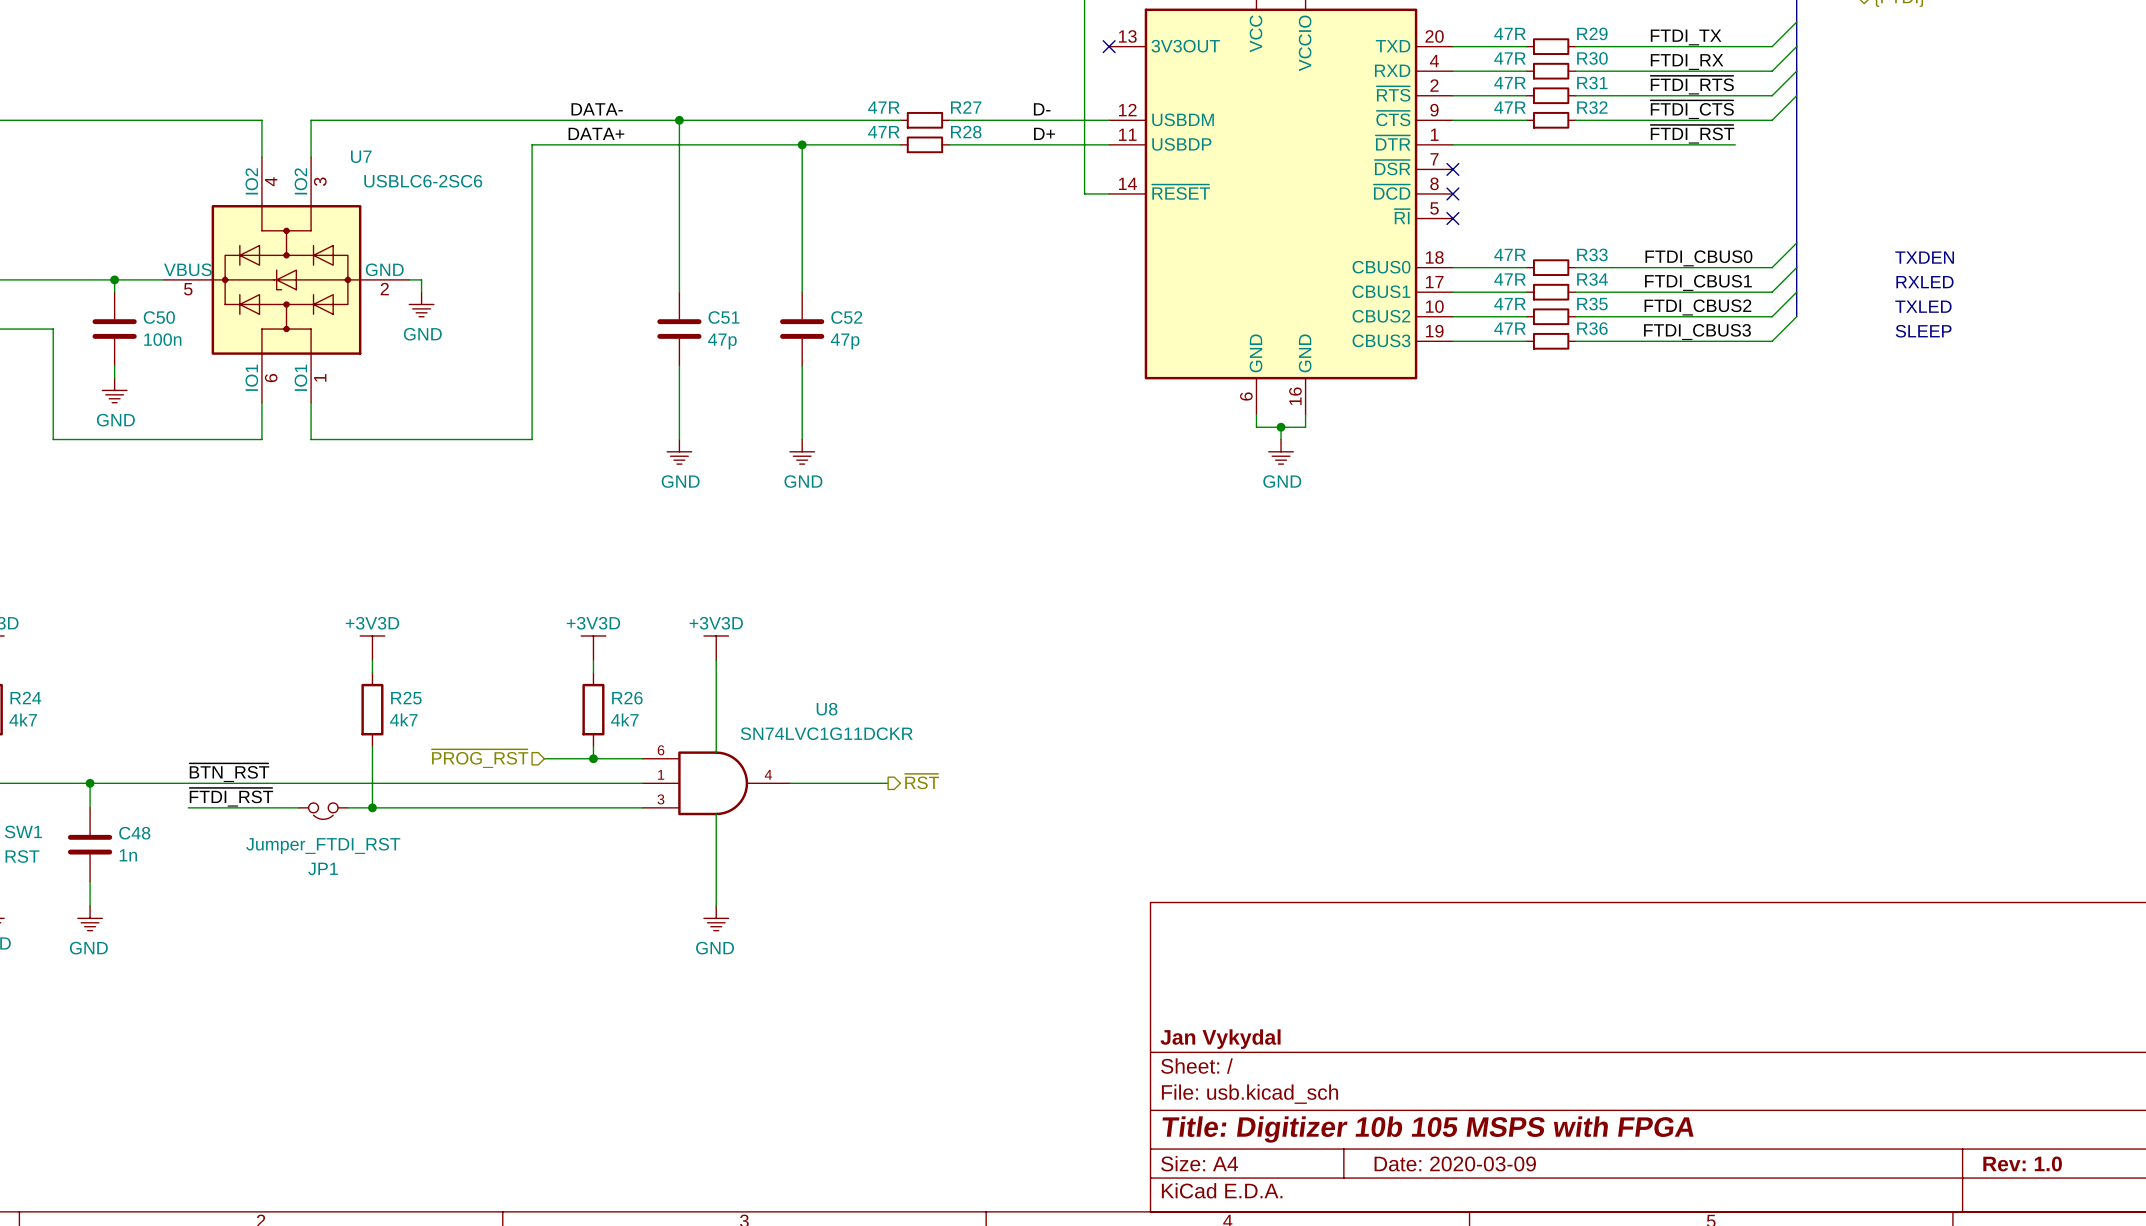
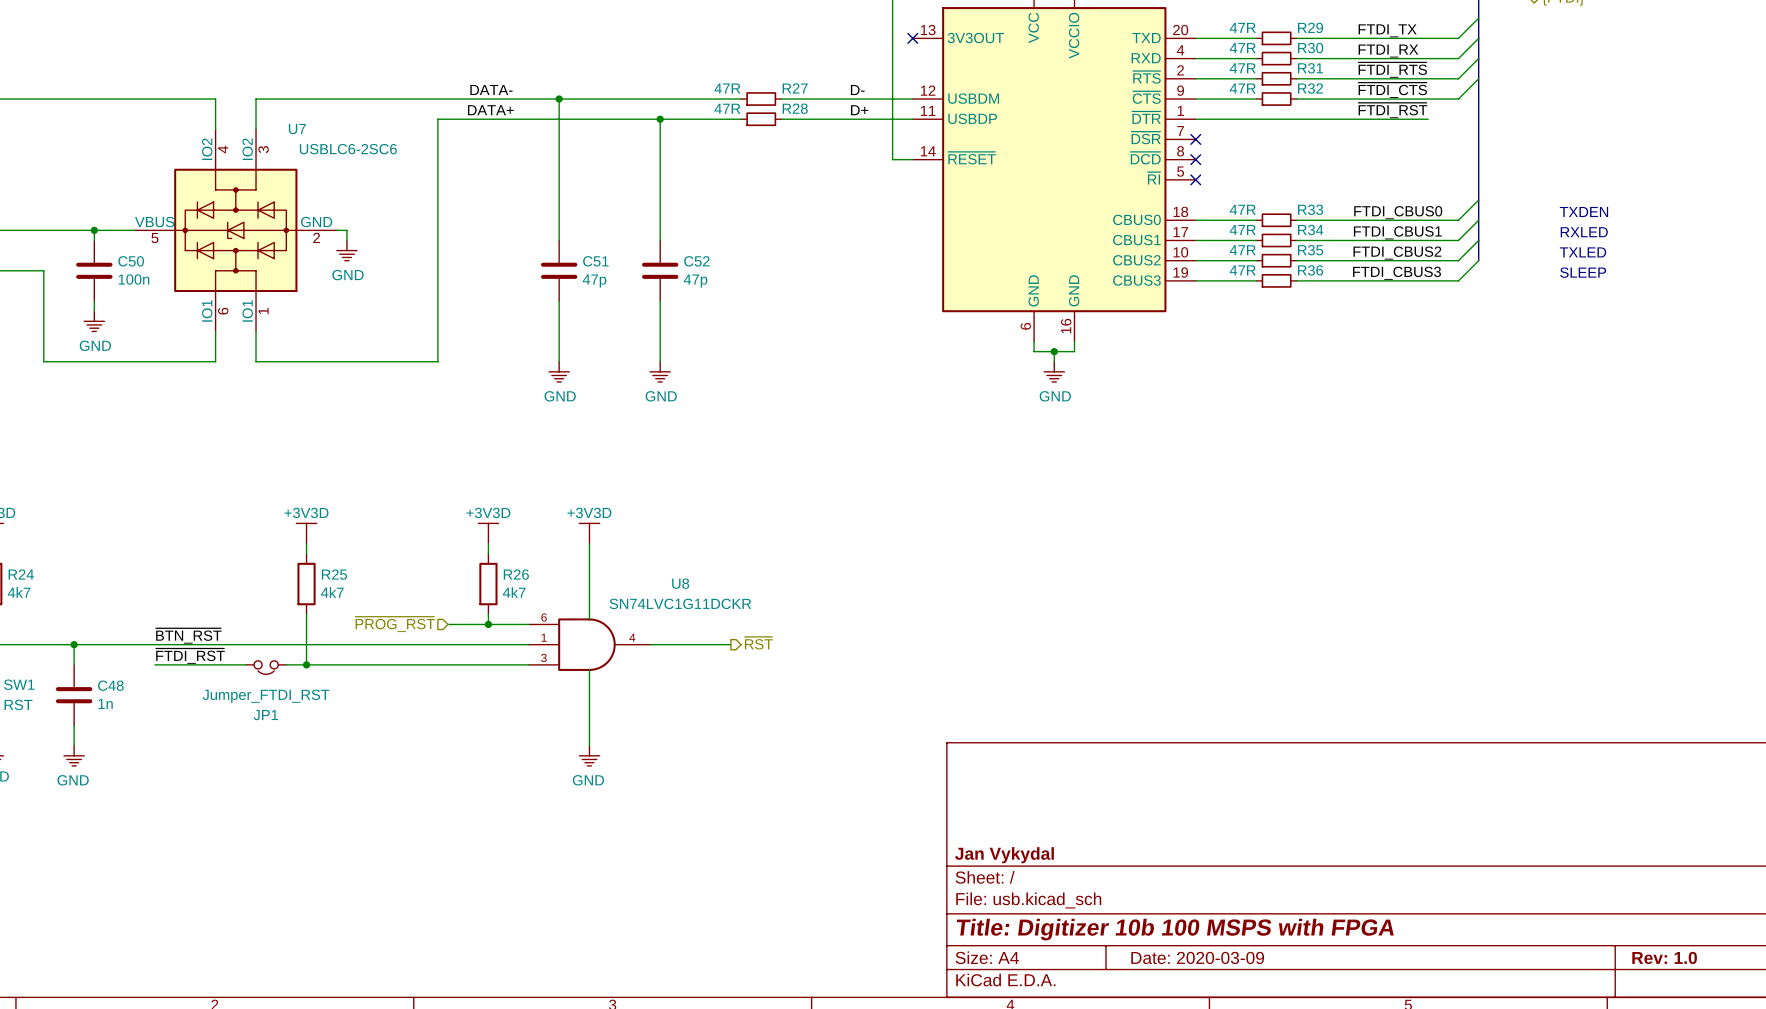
title block: Title: Digitizer 10b 105 MSPS with FPGA (1428, 1129) -> Title: Digitizer 10b 100 MSPS with FPGA (1175, 929)

